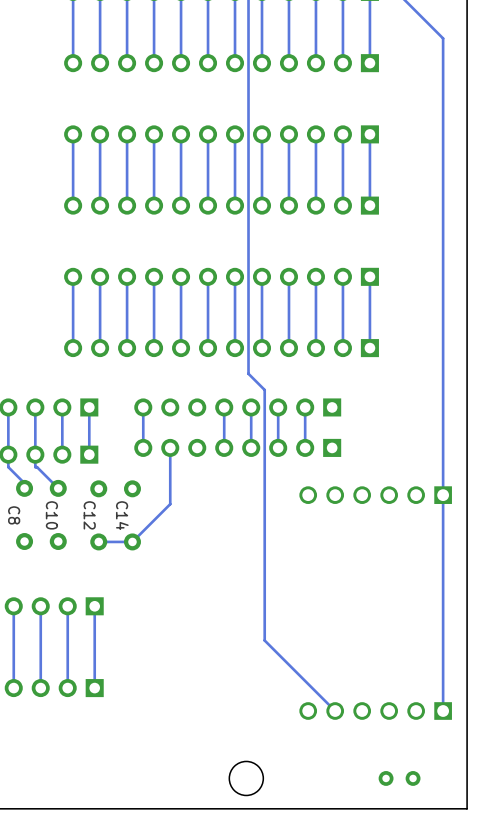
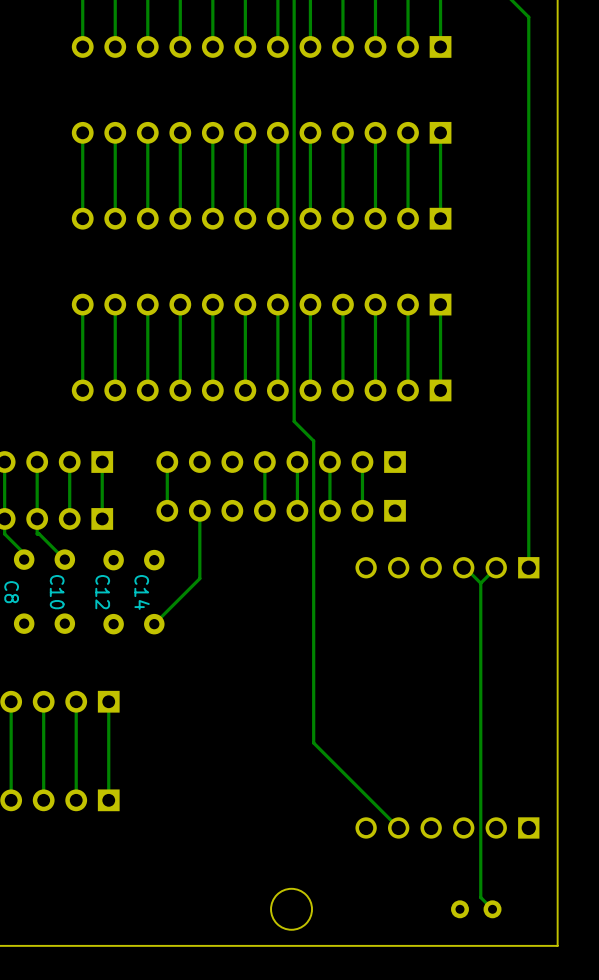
track: none -> (463, 567) (480, 583)
track: none -> (496, 567) (480, 583)
track: (443, 495) (443, 711) -> none
track: none -> (480, 583) (480, 897) (492, 909)
track: (132, 541) (98, 541) -> none

